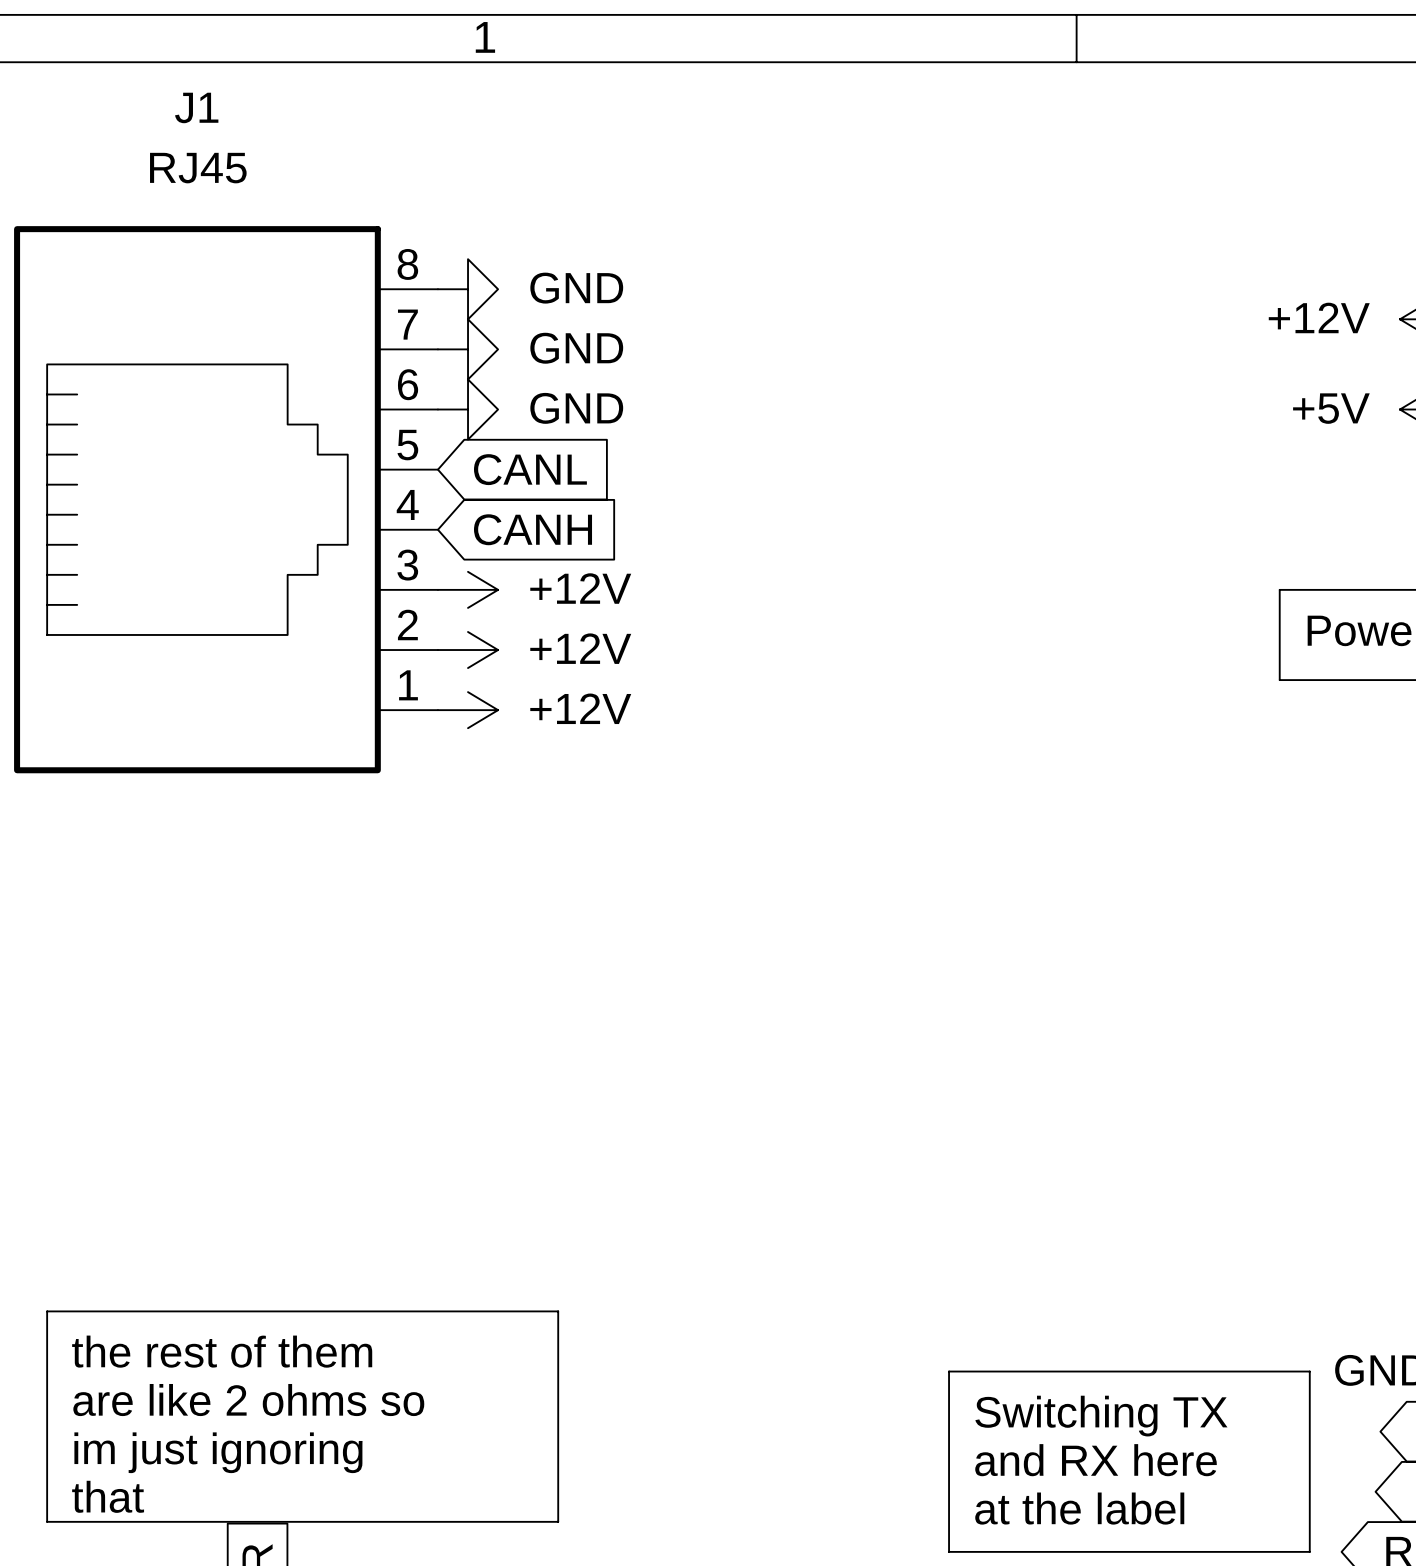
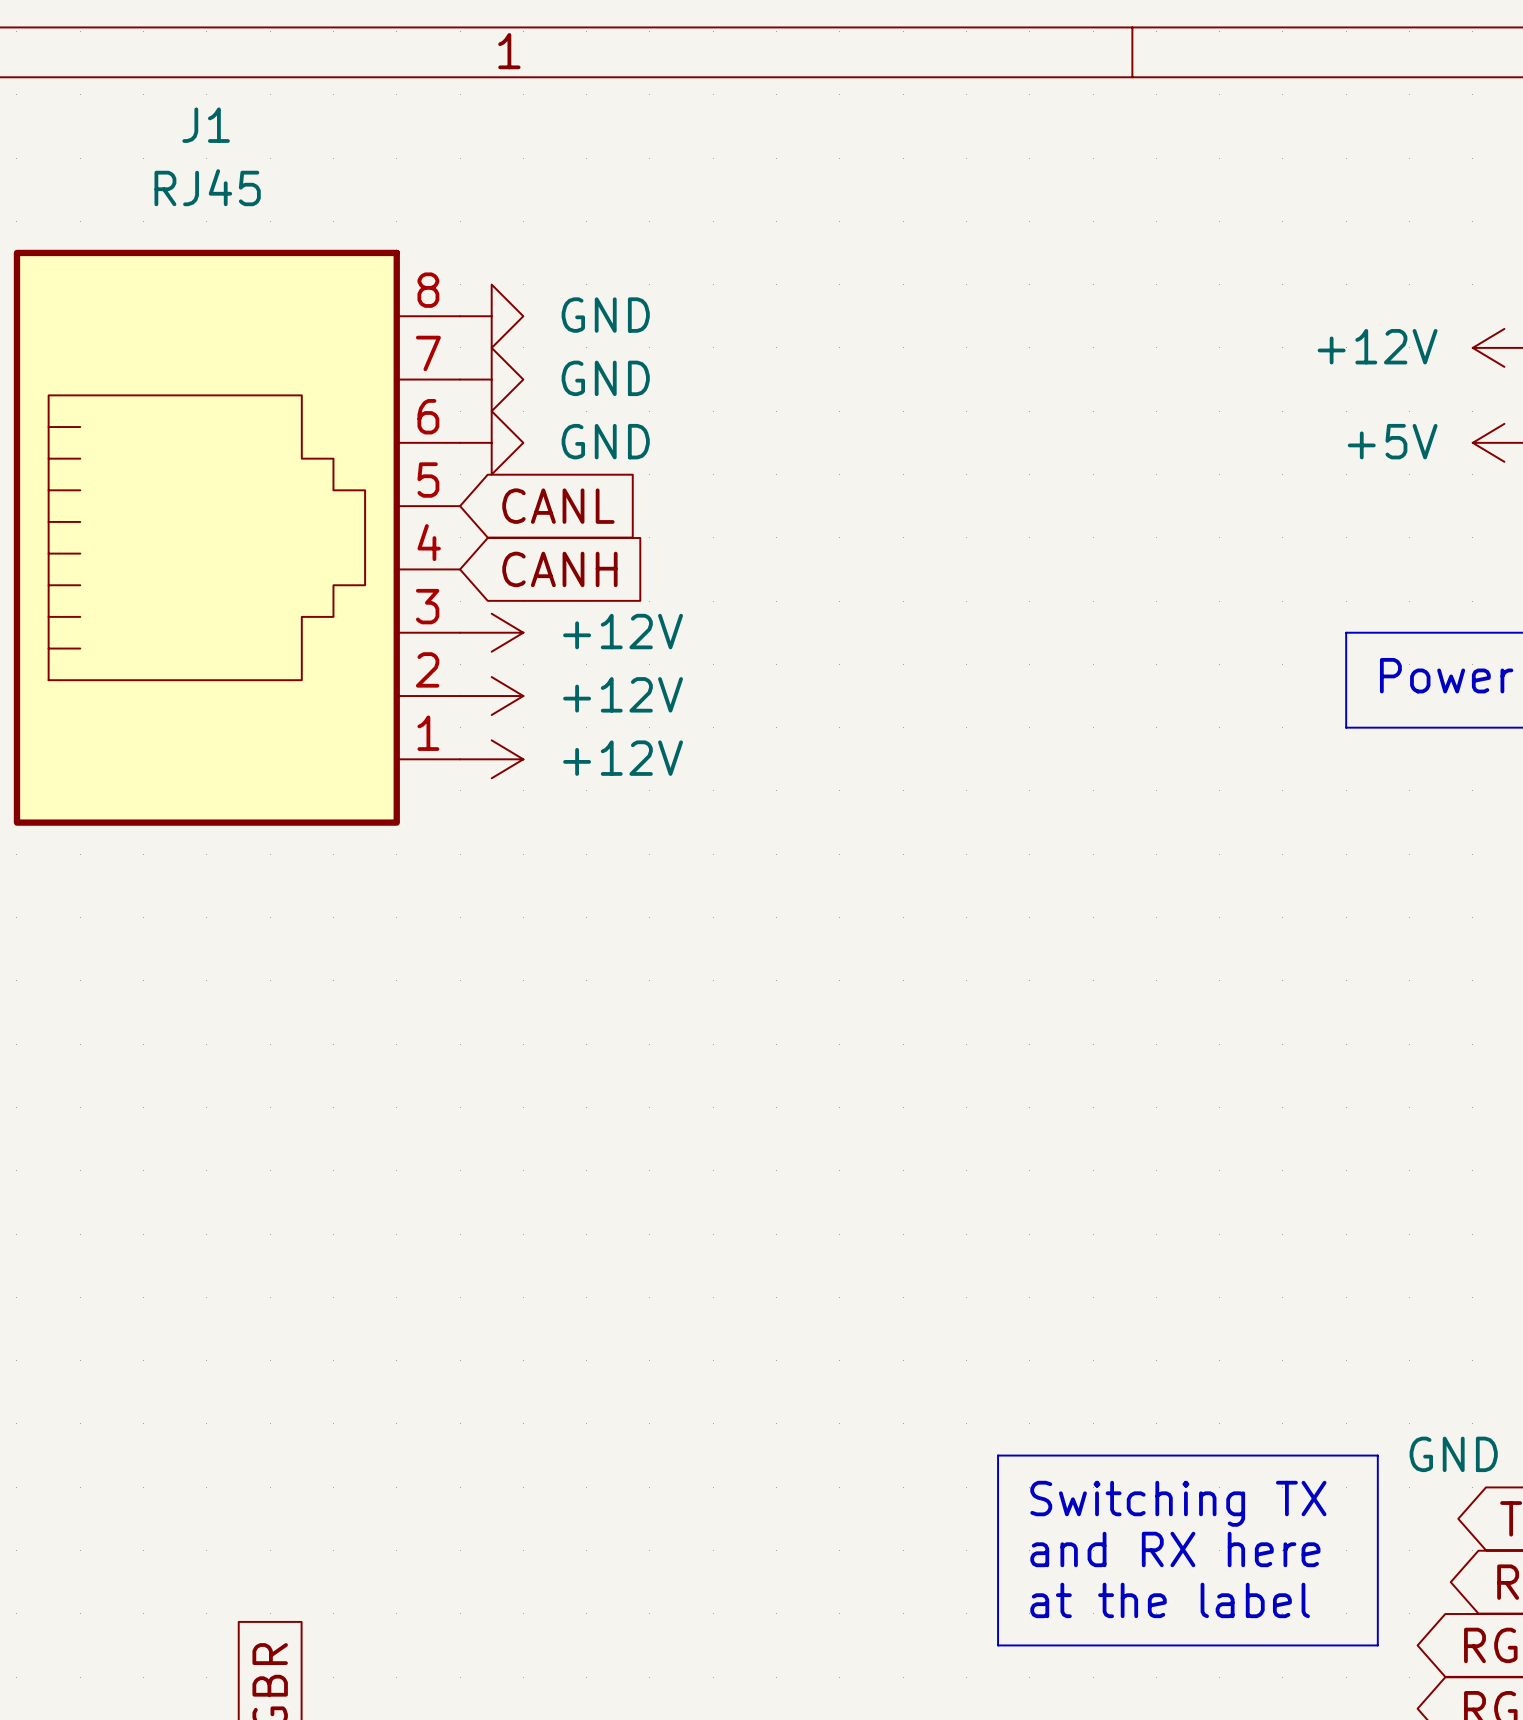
line: (47, 1311) (558, 1311) (558, 1521) (47, 1521) (47, 1311) -> none
text: the rest of them (222, 1351) -> none
text: are like 2 ohms so (248, 1400) -> none
text: im just ignoring (218, 1452) -> none
text: that (108, 1496) -> none

